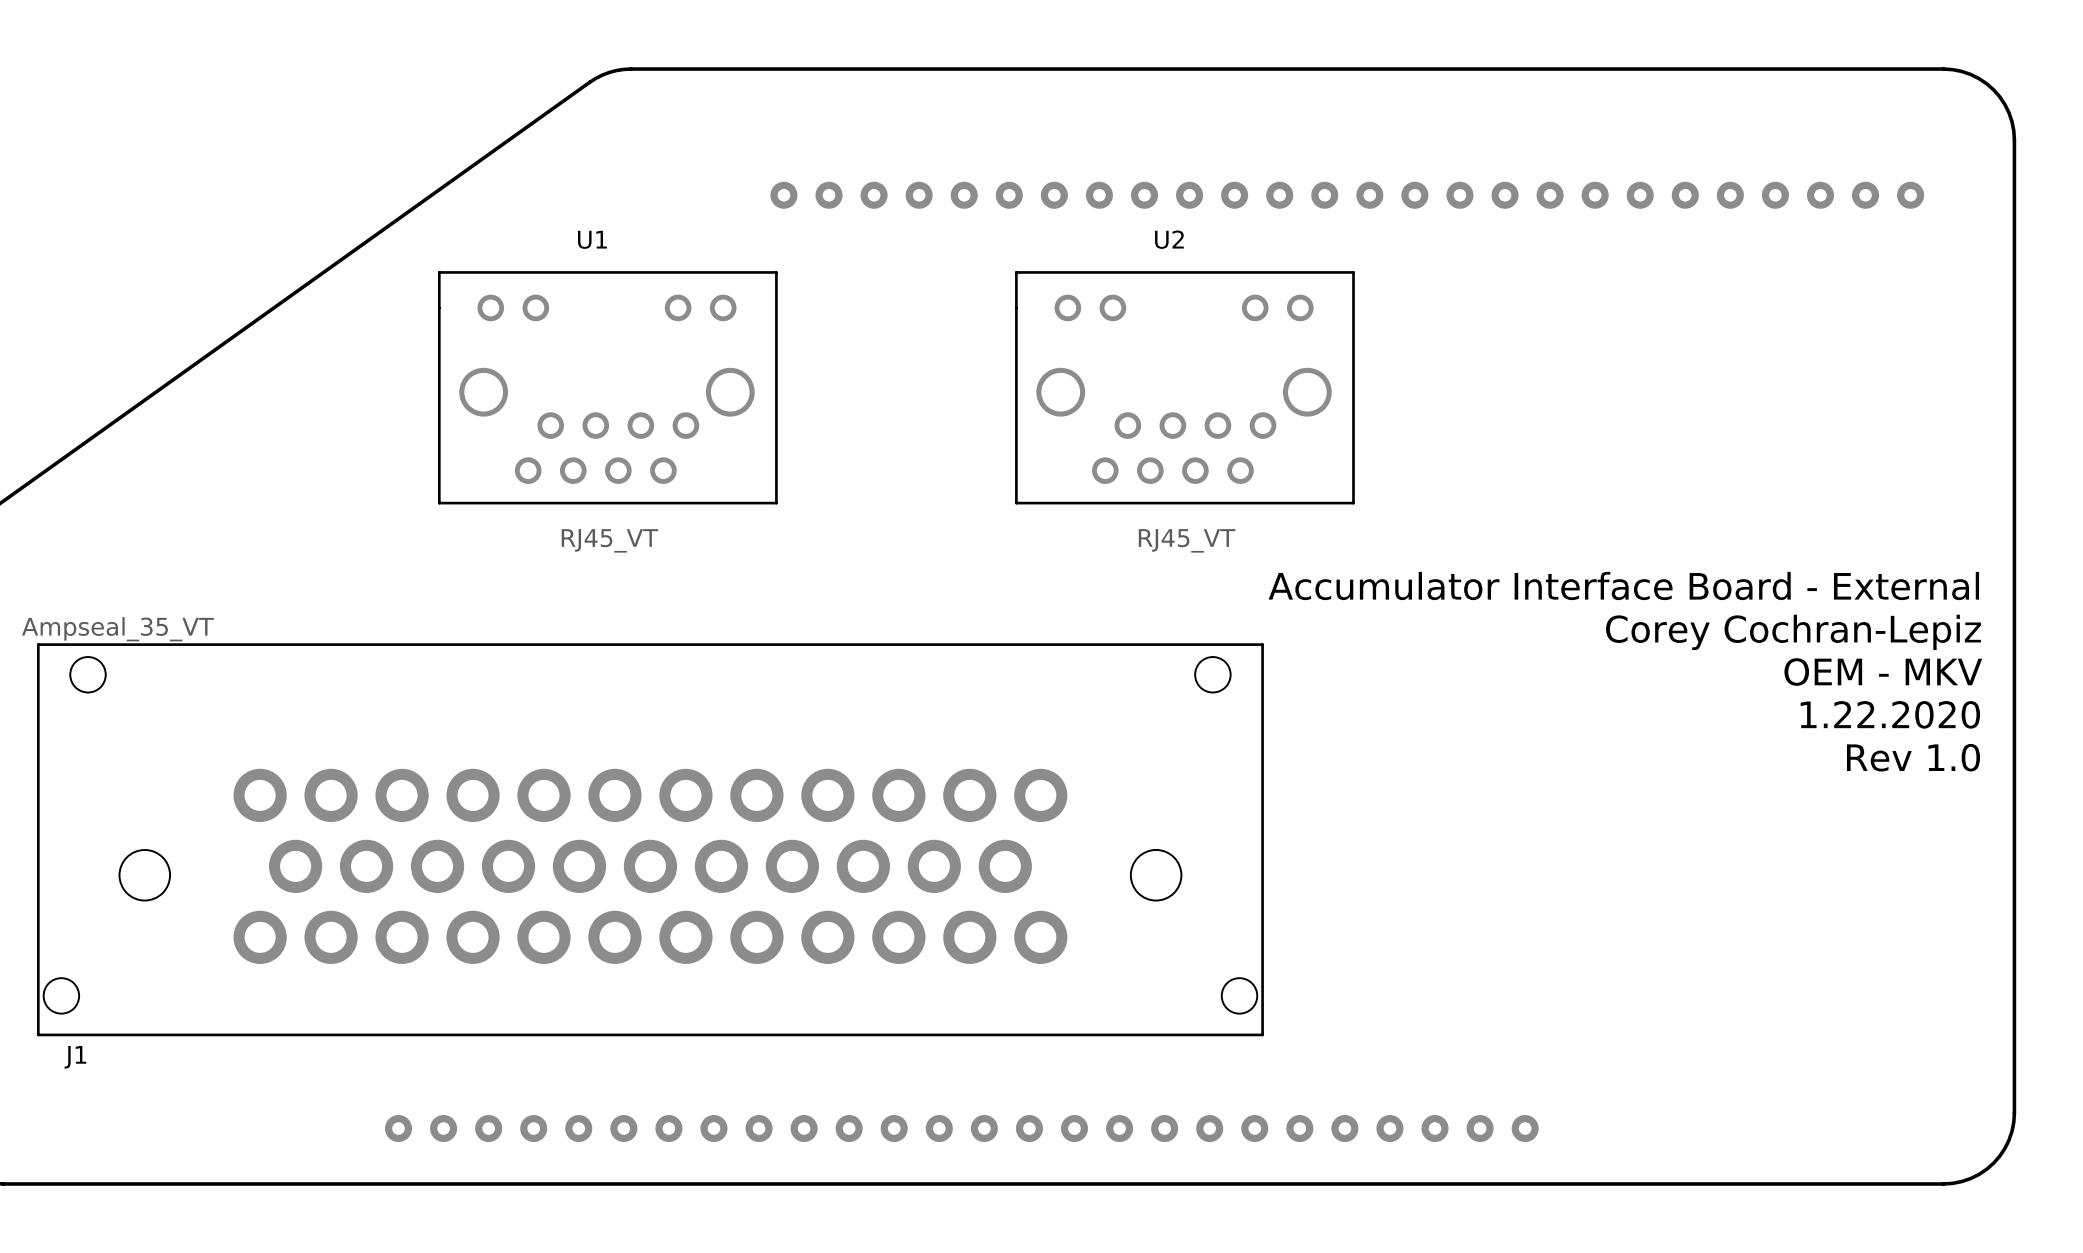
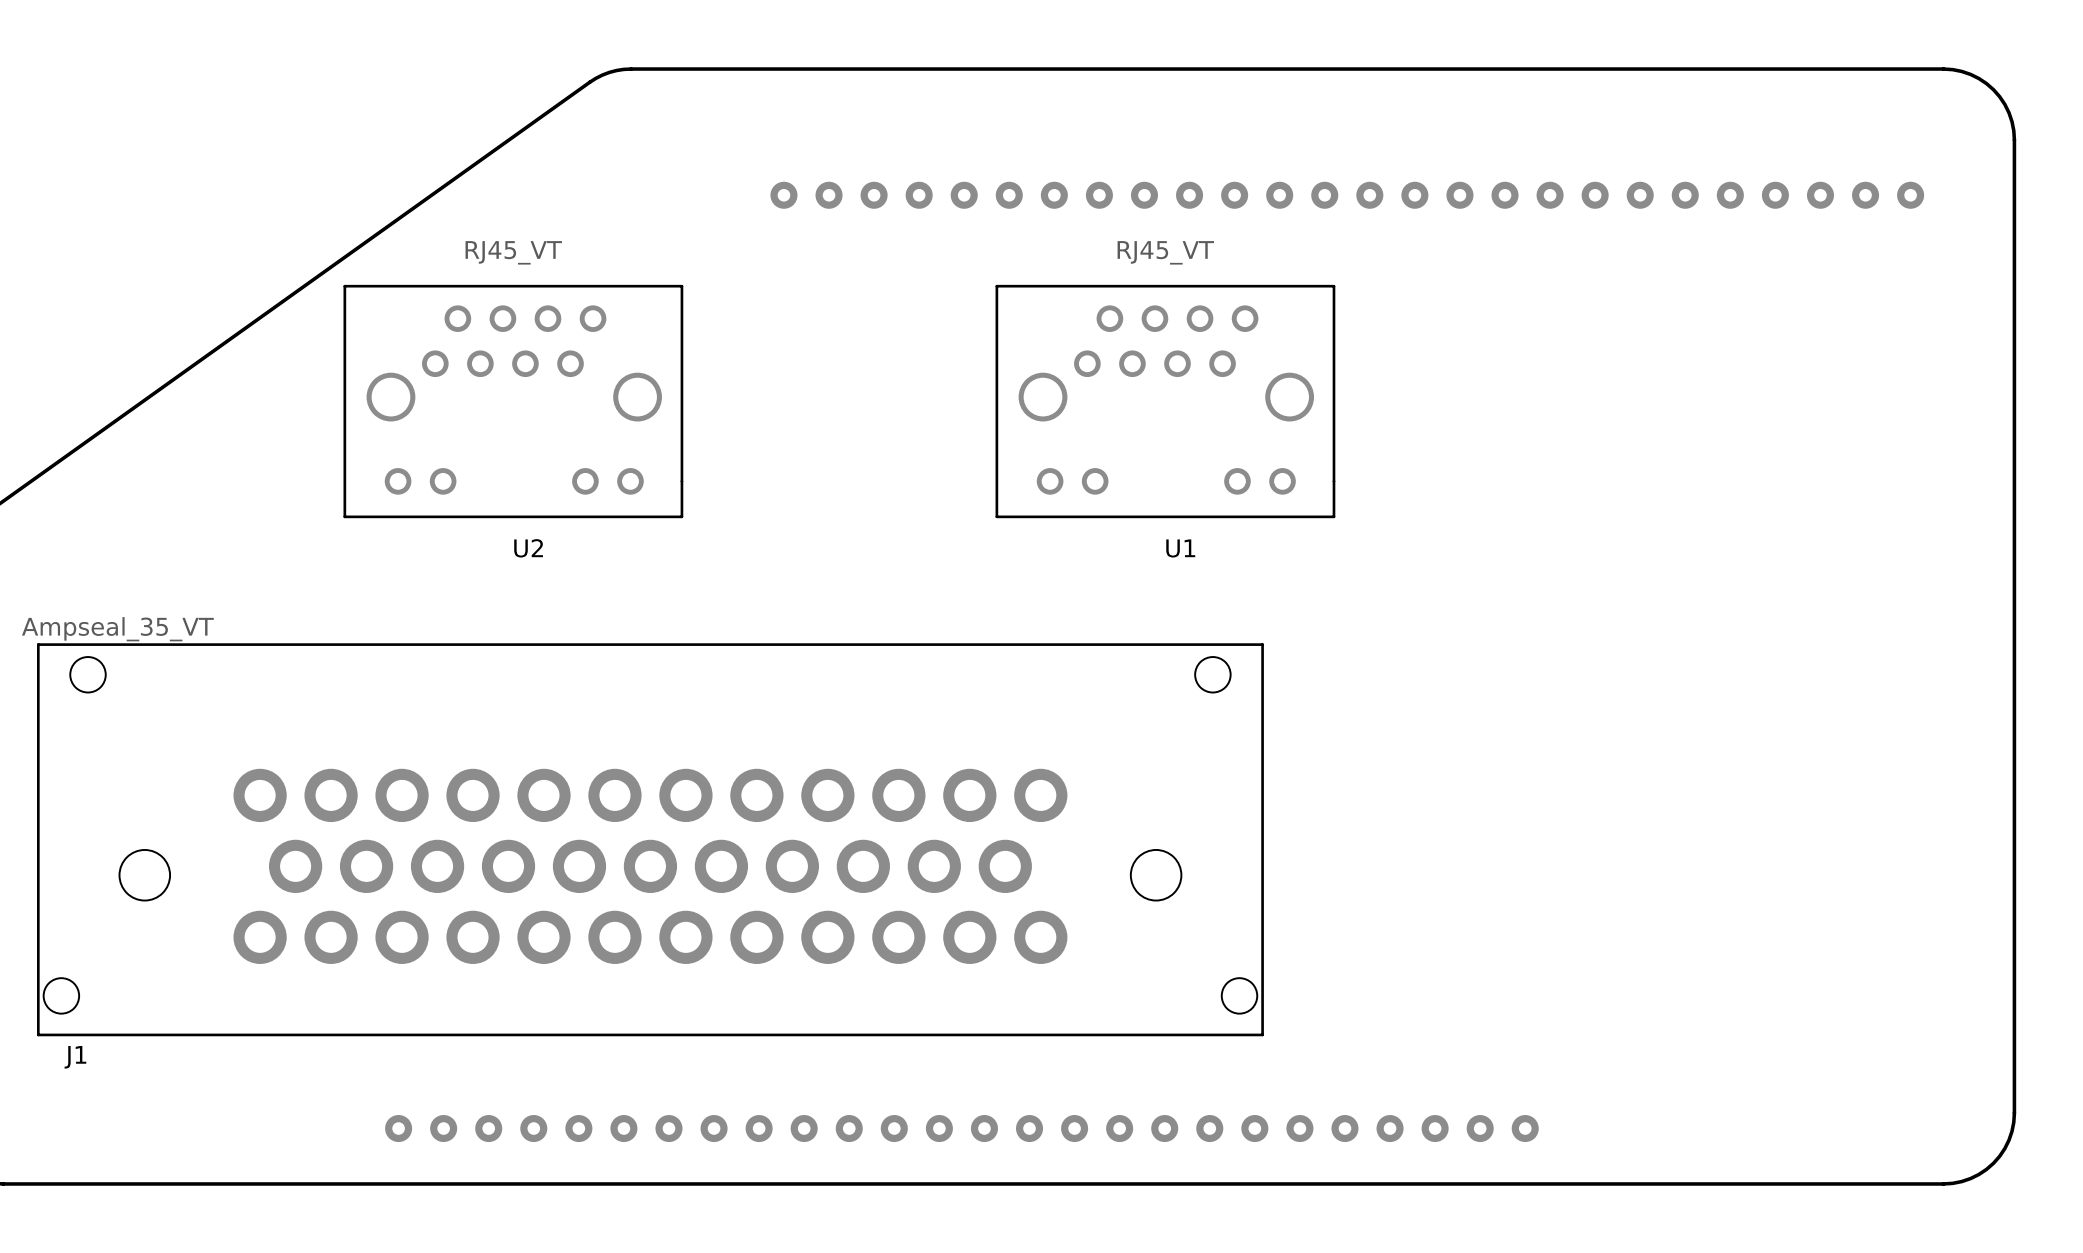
U1 rotation: 0° (607, 387) -> 180° (1165, 401)
U1 position: (607, 387) -> (1165, 401)
U2 rotation: 0° (1184, 387) -> 180° (513, 401)
U2 position: (1184, 387) -> (513, 401)
text: Accumulator Interface Board - External (1623, 585) -> none
text: Corey Cochran-Lepiz (1793, 632) -> none
text: OEM - MKV (1883, 672) -> none
text: 1.22.2020 (1890, 714) -> none
text: Rev 1.0 (1913, 757) -> none

